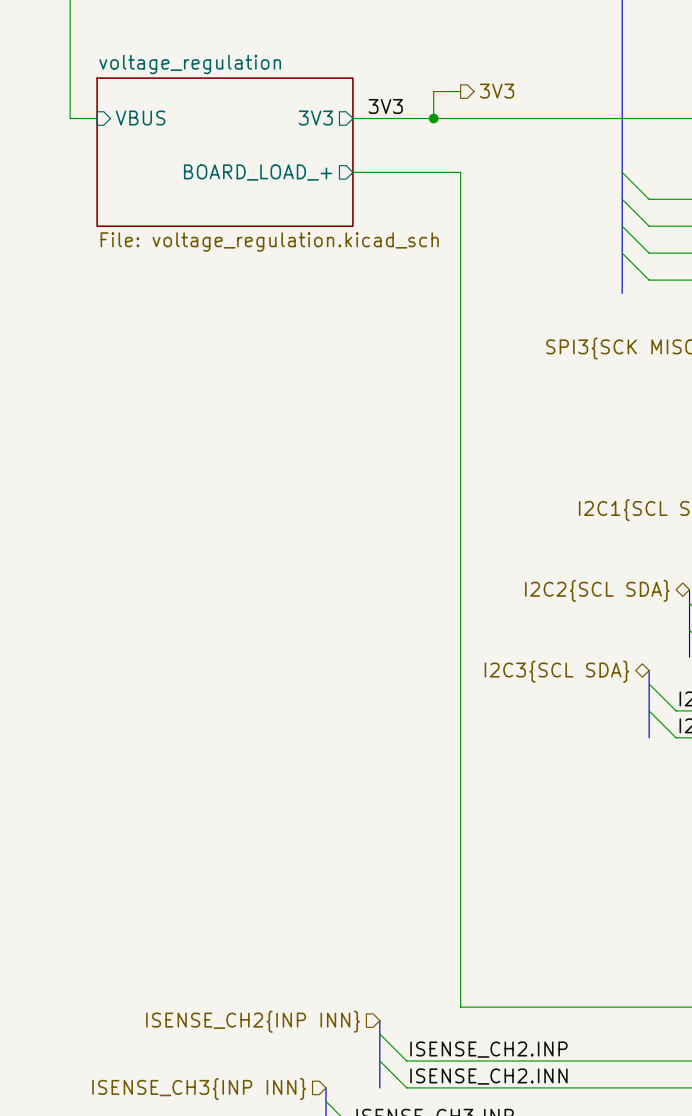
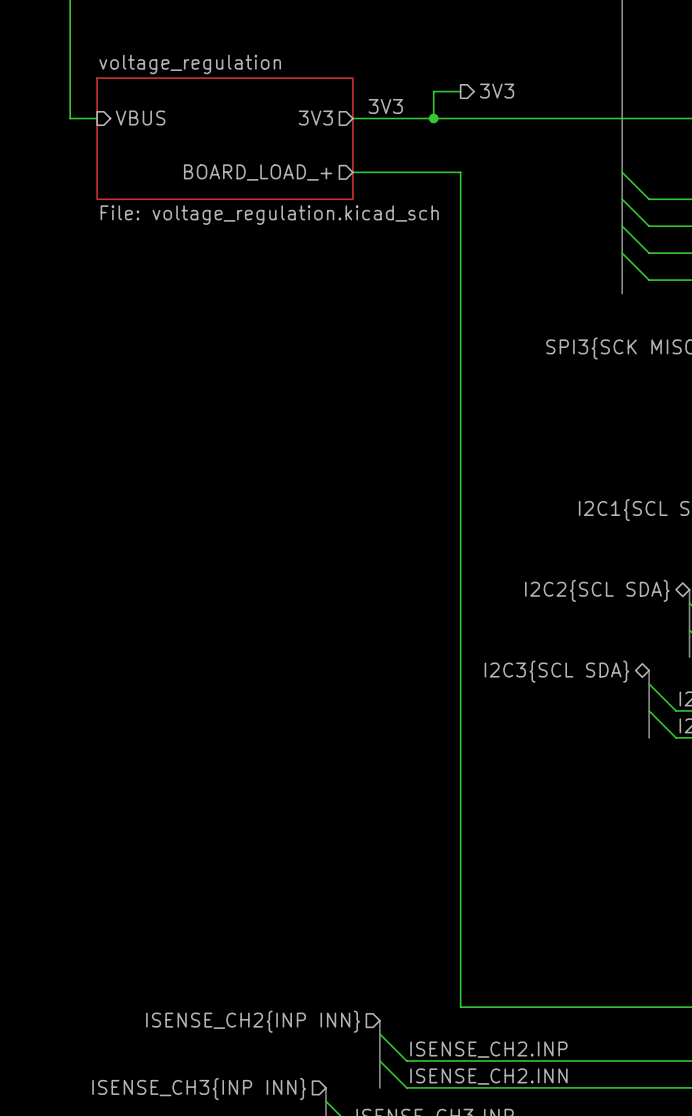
sheet voltage_regulation: none -> File: voltage_regulation.kicad_sch (225, 138)
sheet voltage_regulation: File: voltage_regulation.kicad_sch (225, 152) -> none

